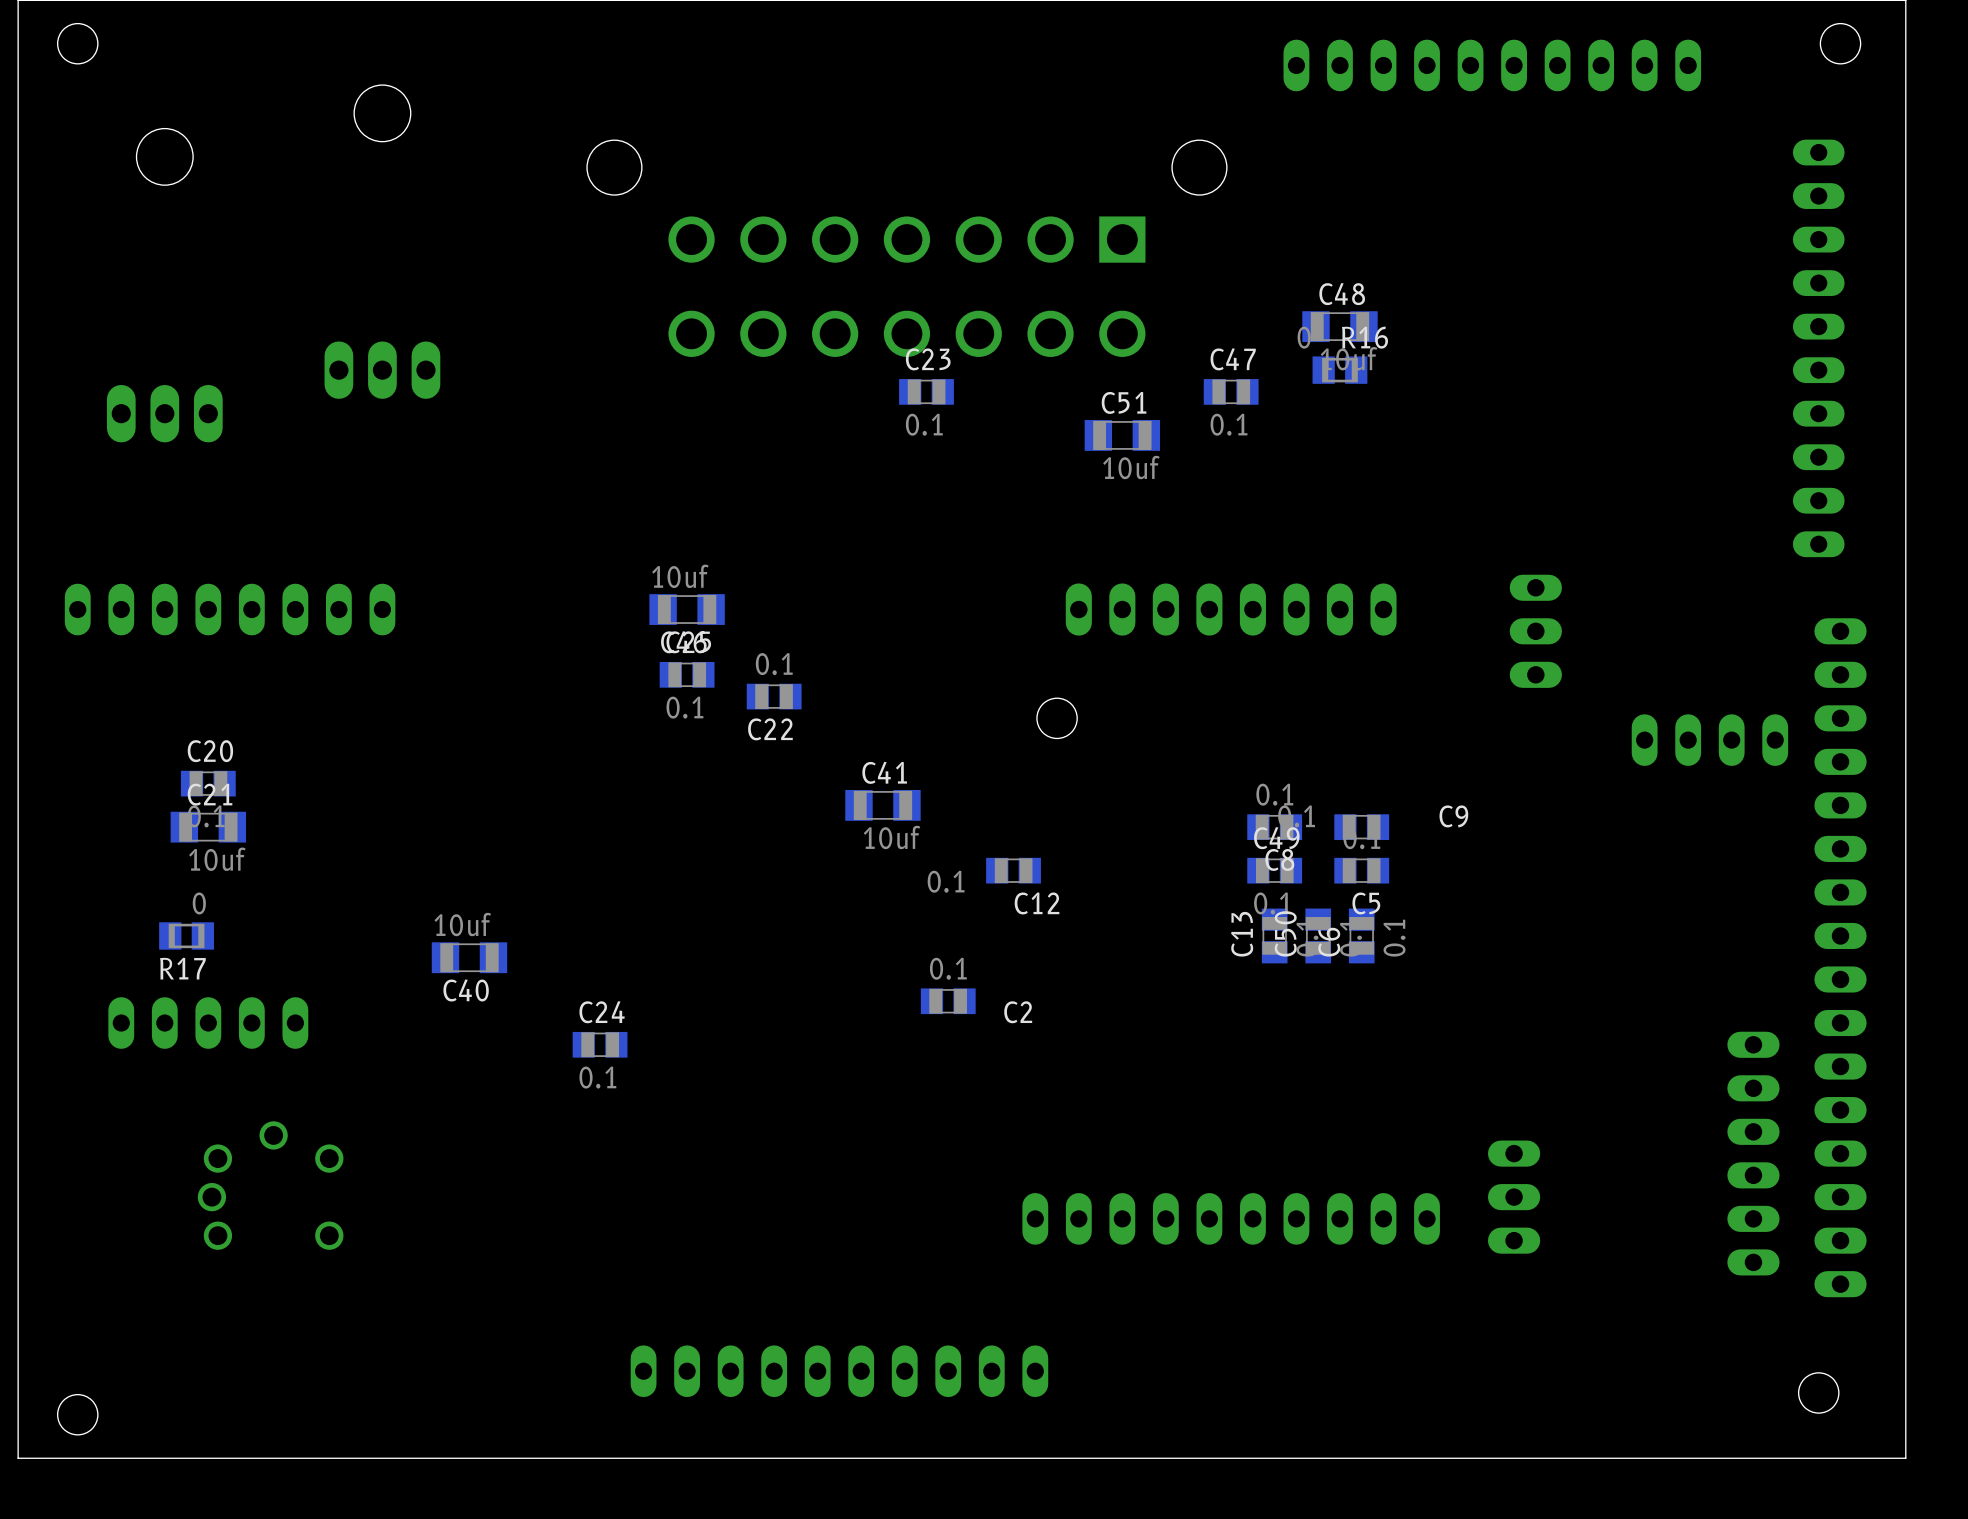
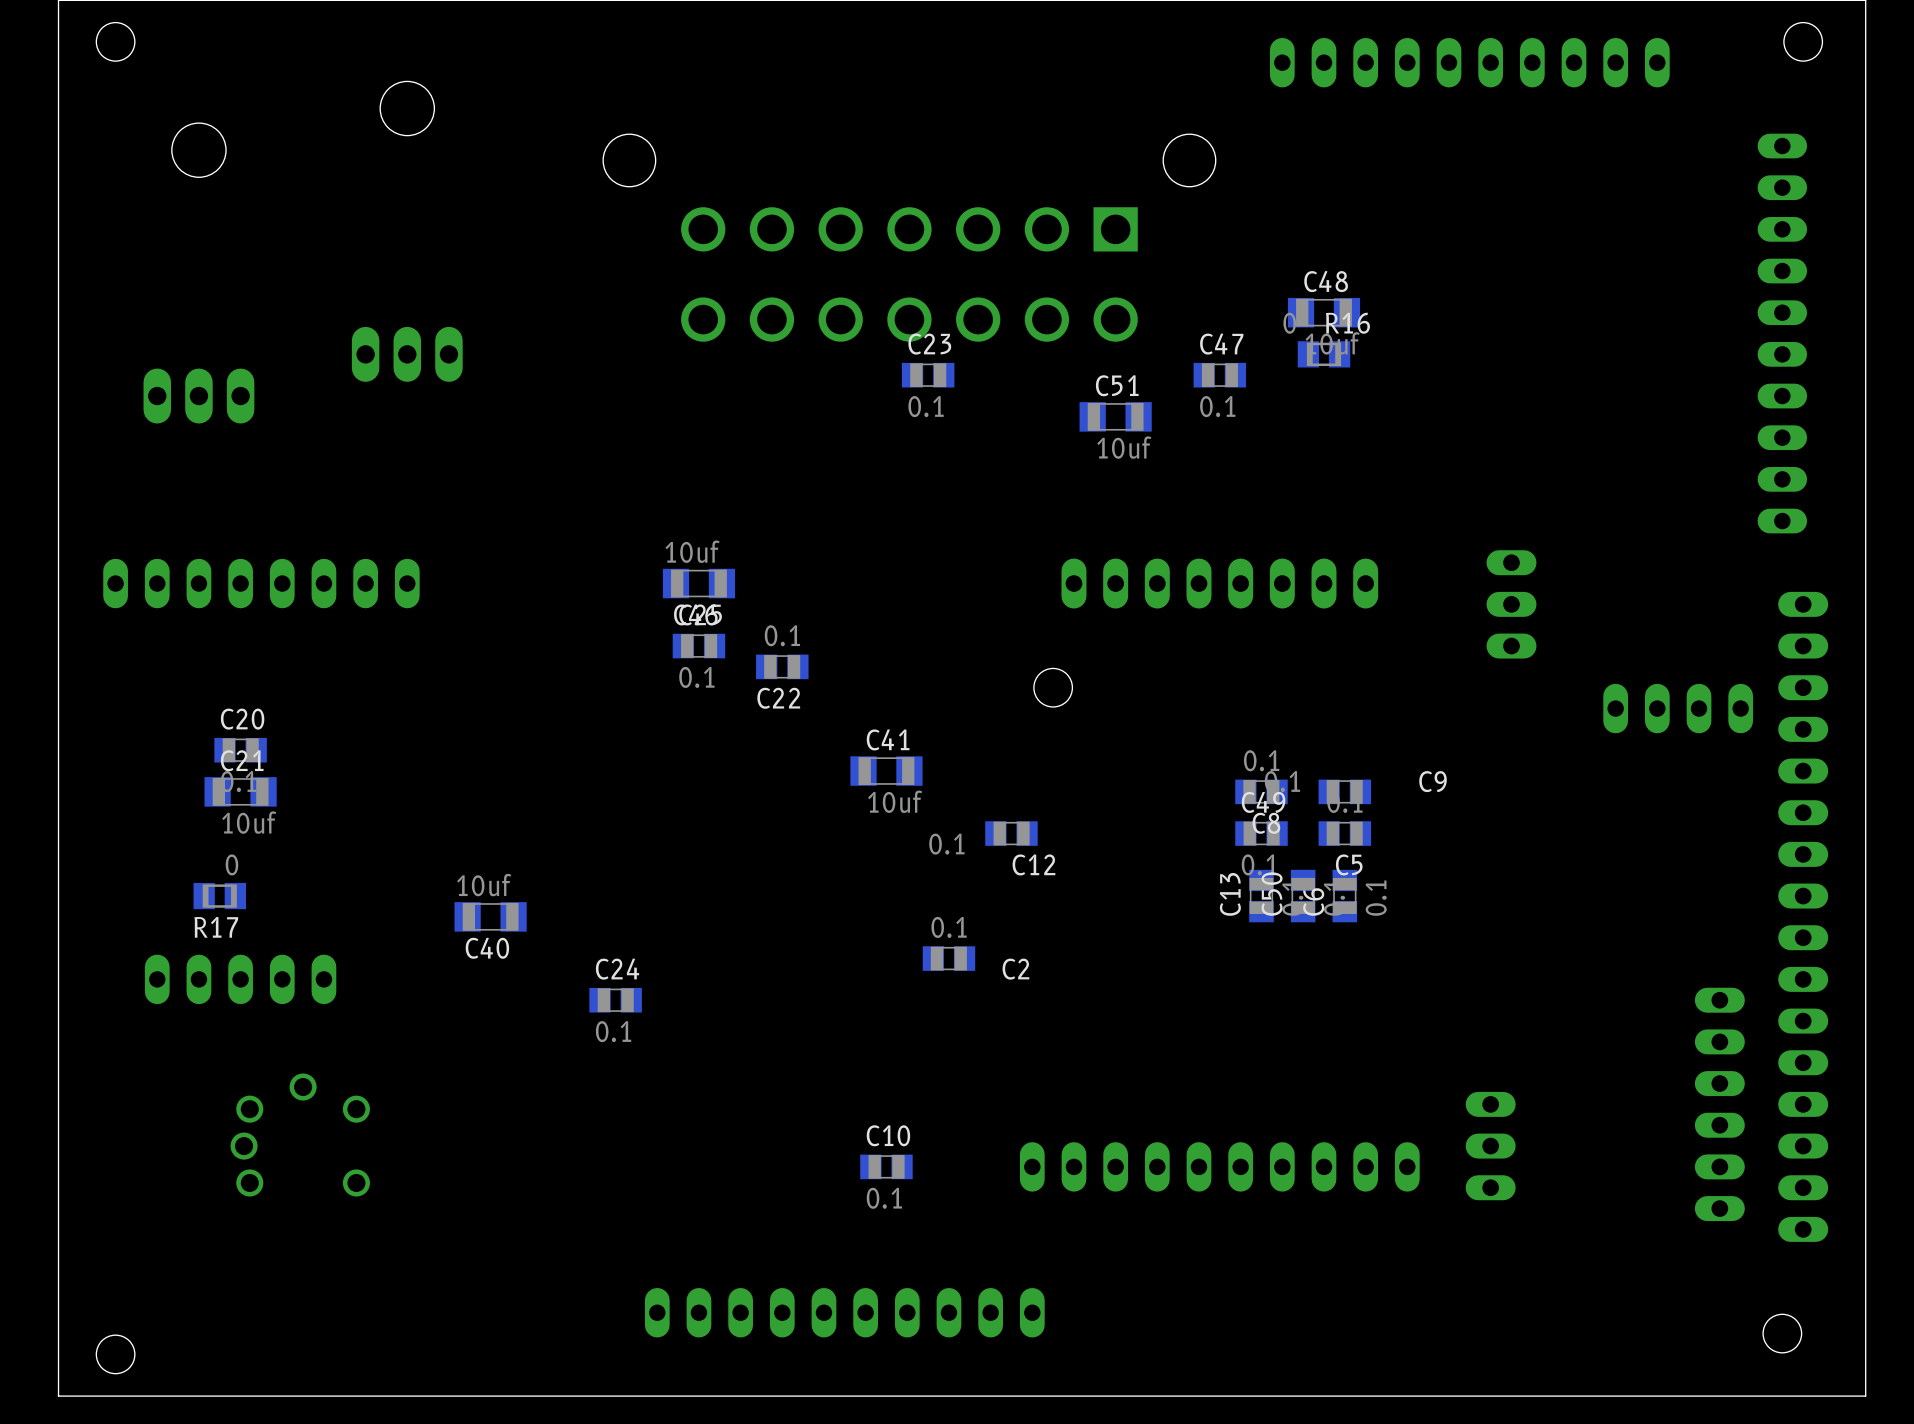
C10: none -> 0.1 (886, 1166)

